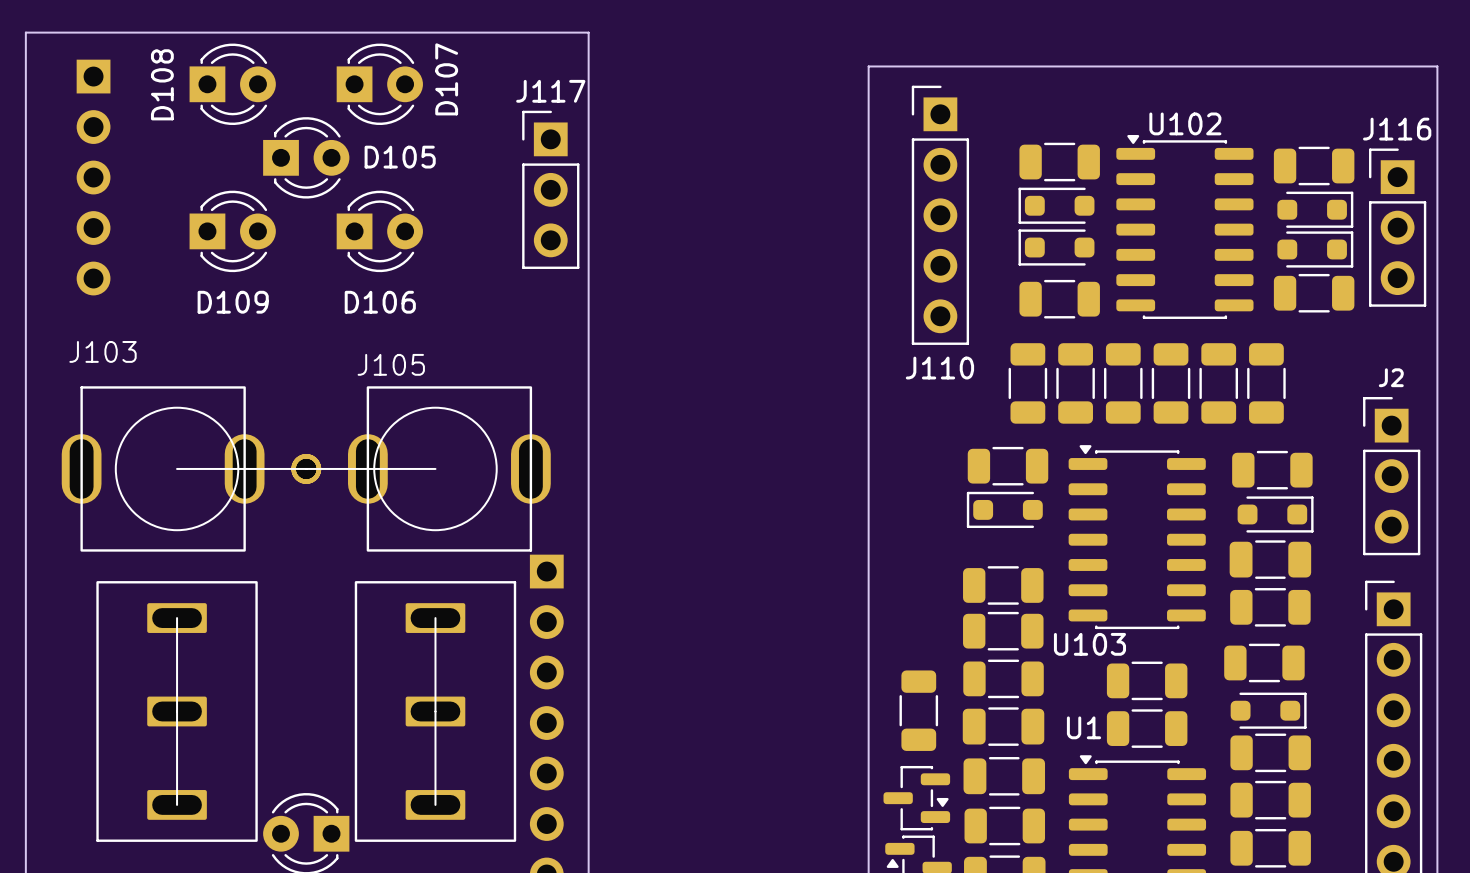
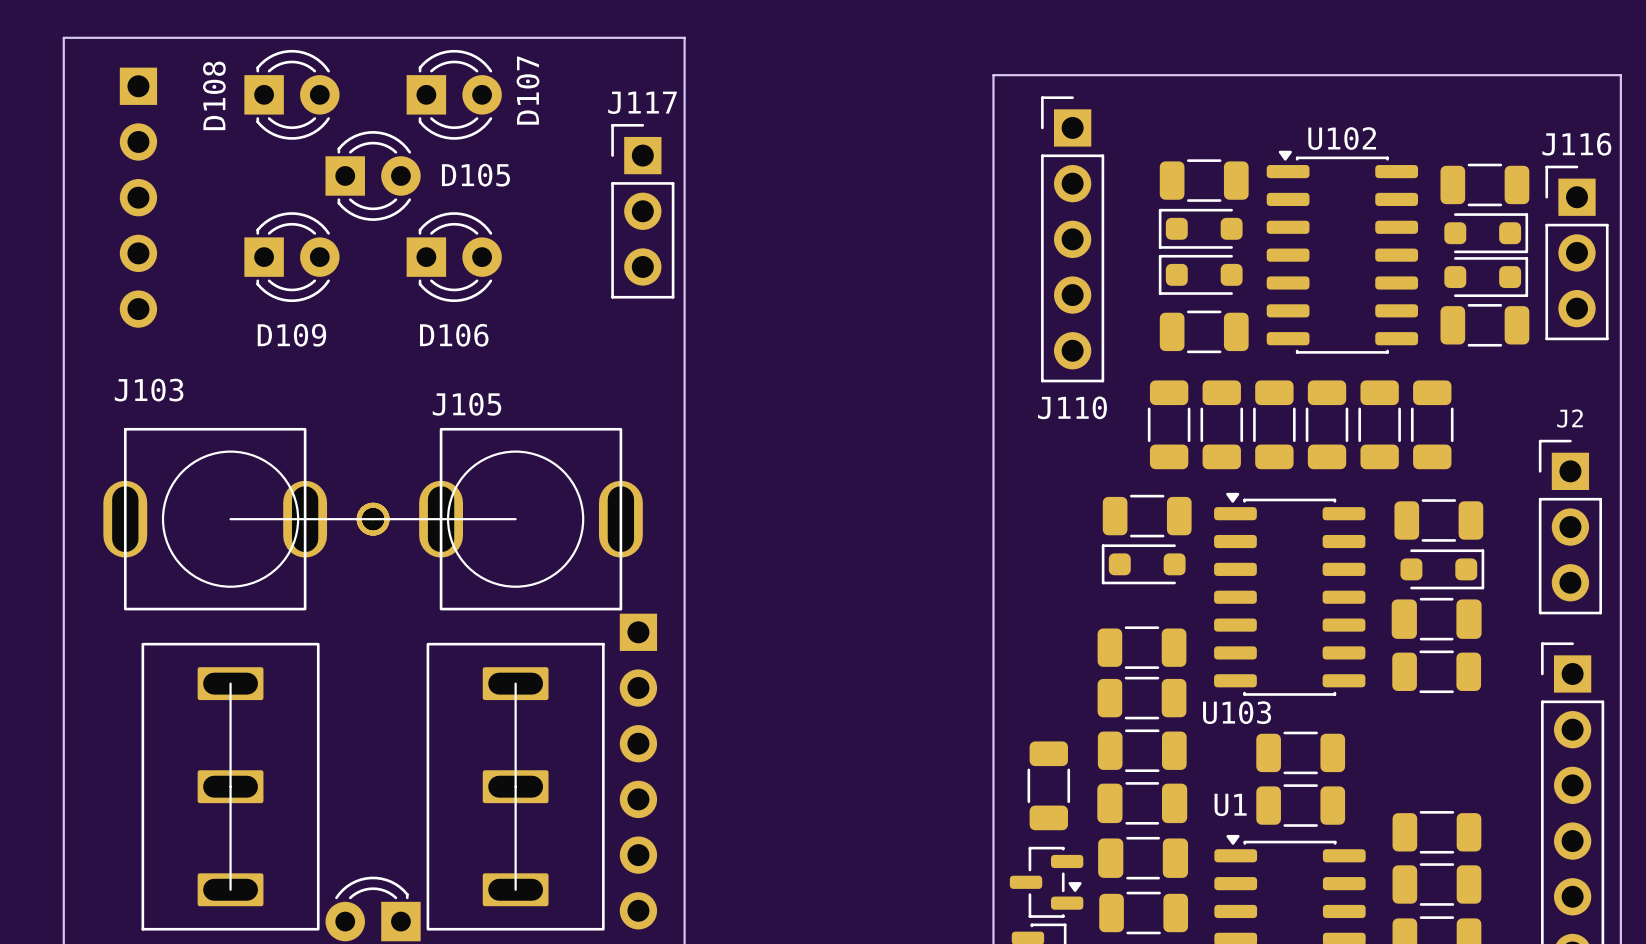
part: (1264, 662) -> none
part: (1268, 710) -> none

